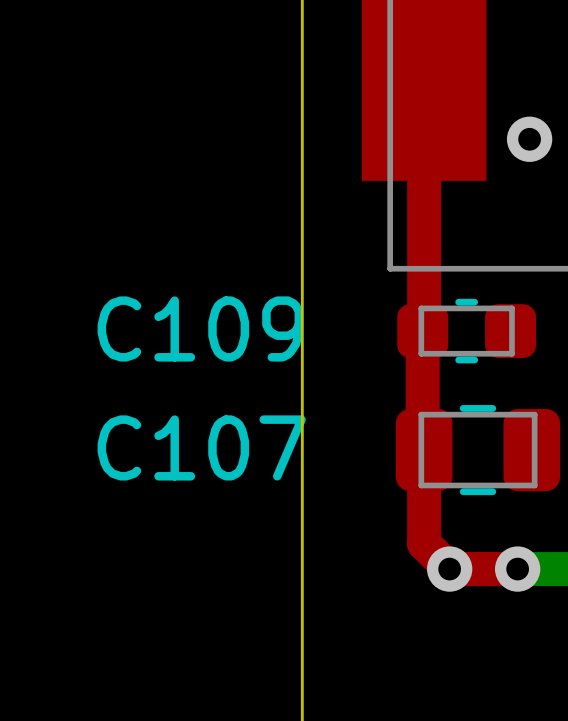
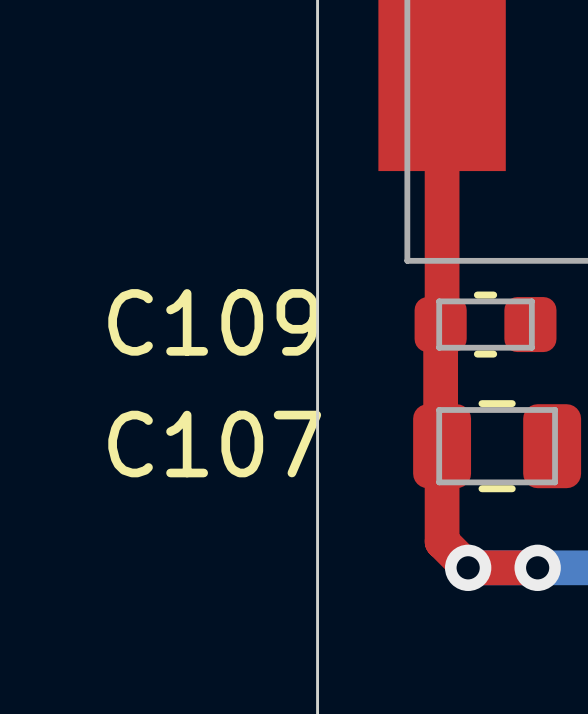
via: (529, 139) -> none

